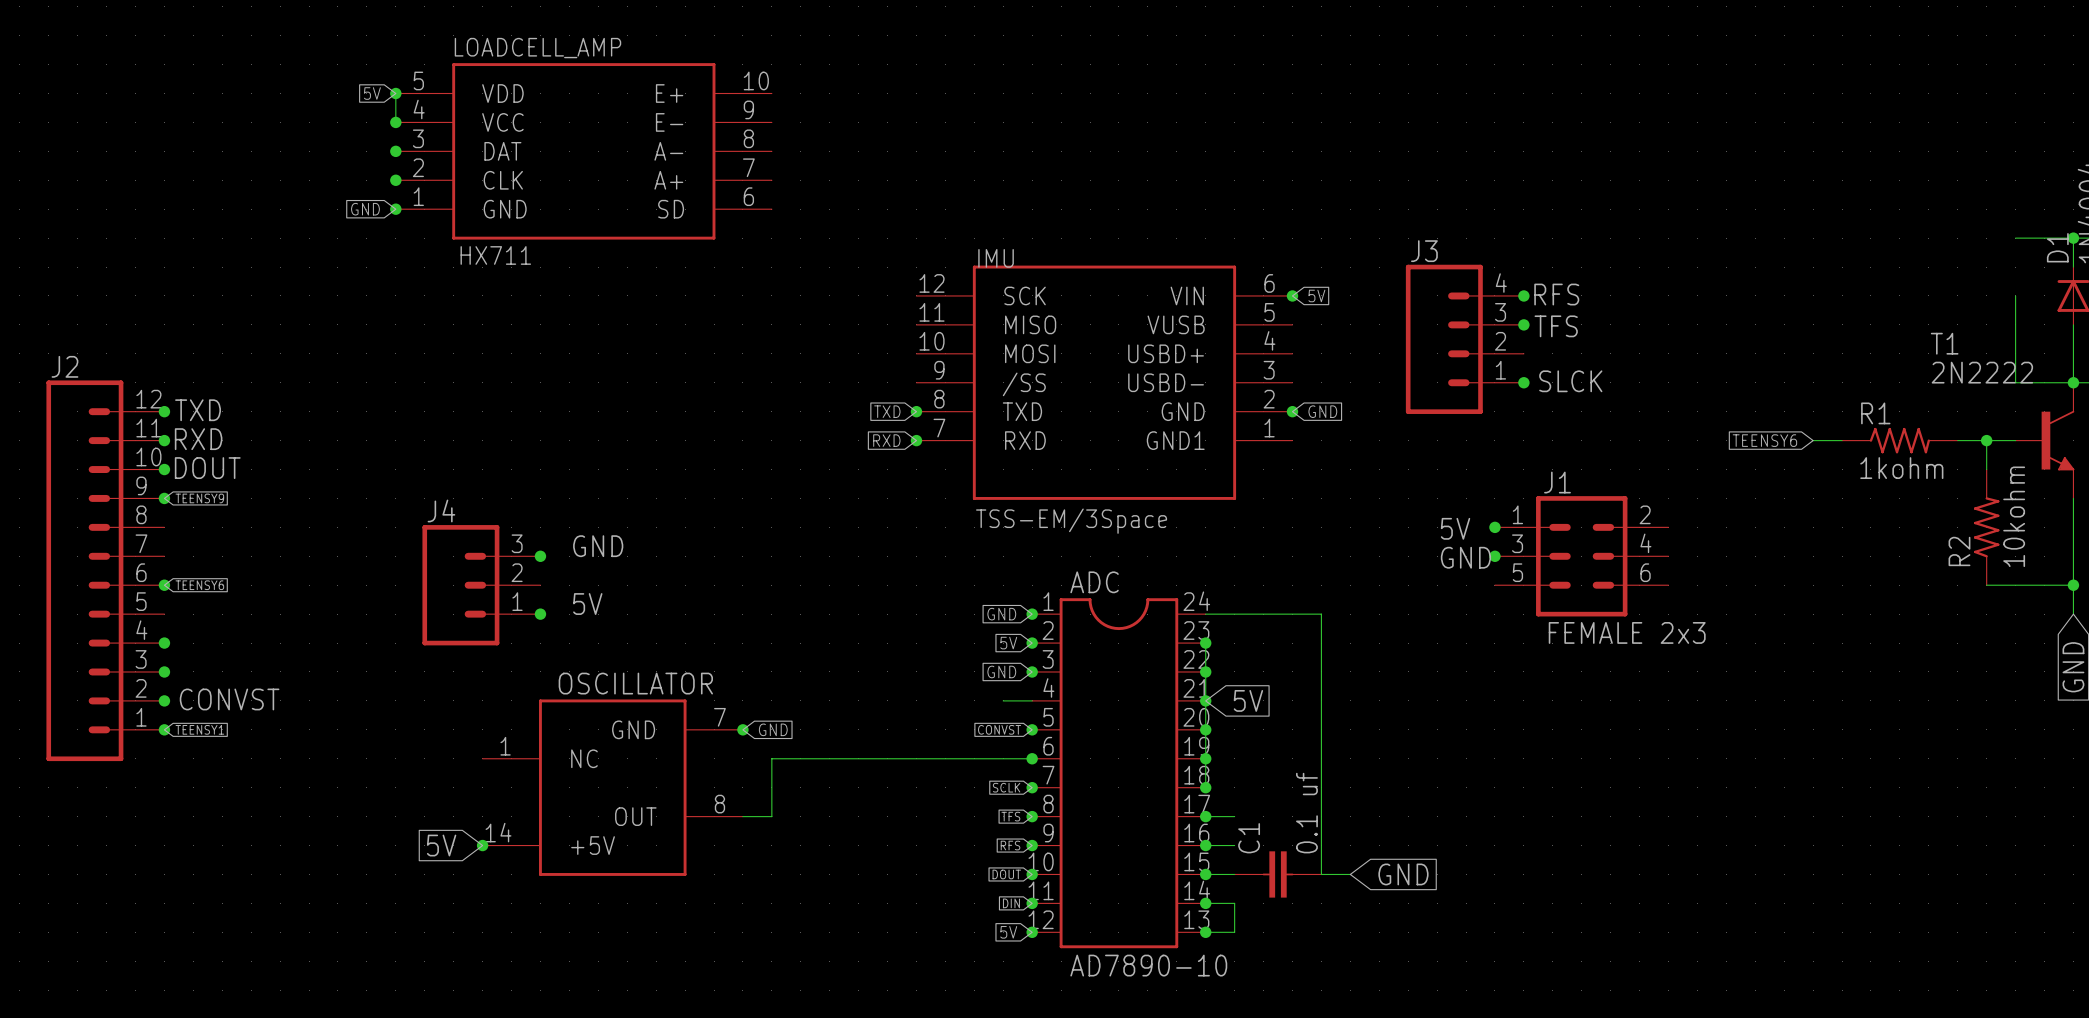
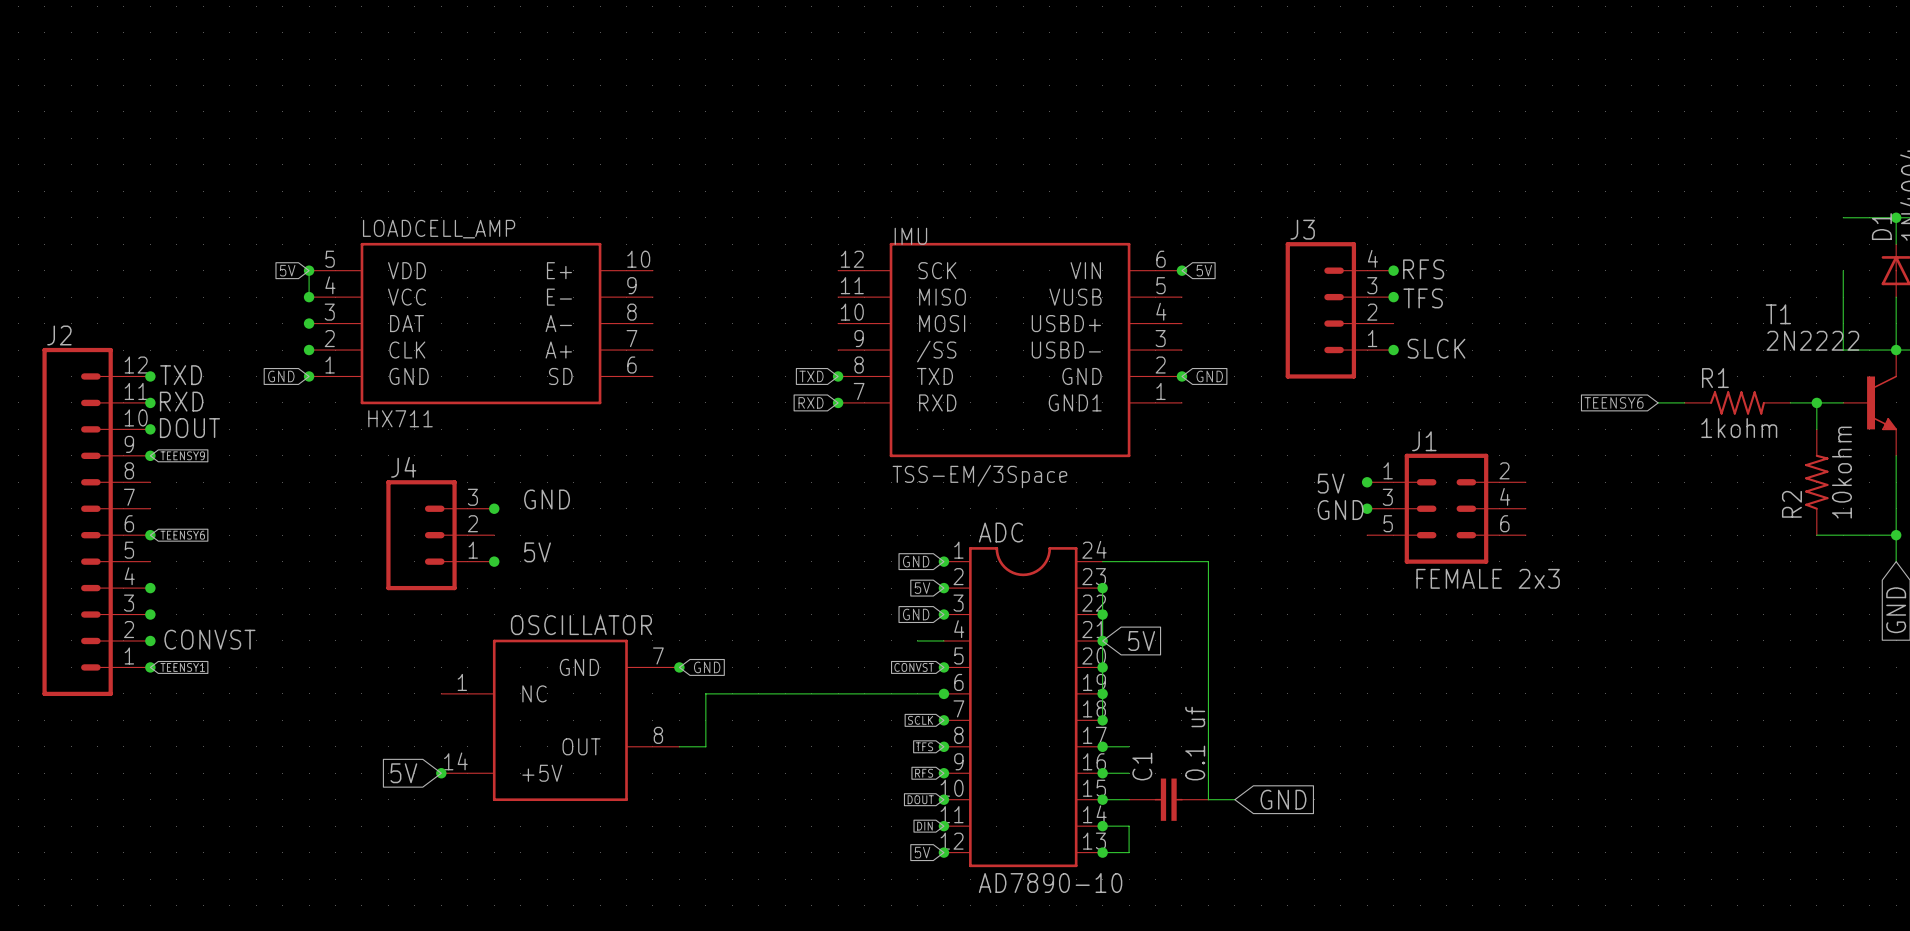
global label position: 5V (372, 93) -> 5V (287, 270)
wire: (395, 93) (395, 122) -> (309, 270) (309, 297)
junction: (395, 93) -> none
junction: (395, 122) -> none
junction: (395, 151) -> none
LOADCELL_AMP position: (583, 151) -> (481, 323)
junction: (395, 180) -> none
global label position: GND (365, 209) -> GND (281, 376)
junction: (395, 209) -> none
junction: none -> (309, 270)
junction: none -> (309, 297)
junction: none -> (309, 323)
junction: none -> (309, 350)
junction: none -> (309, 376)

